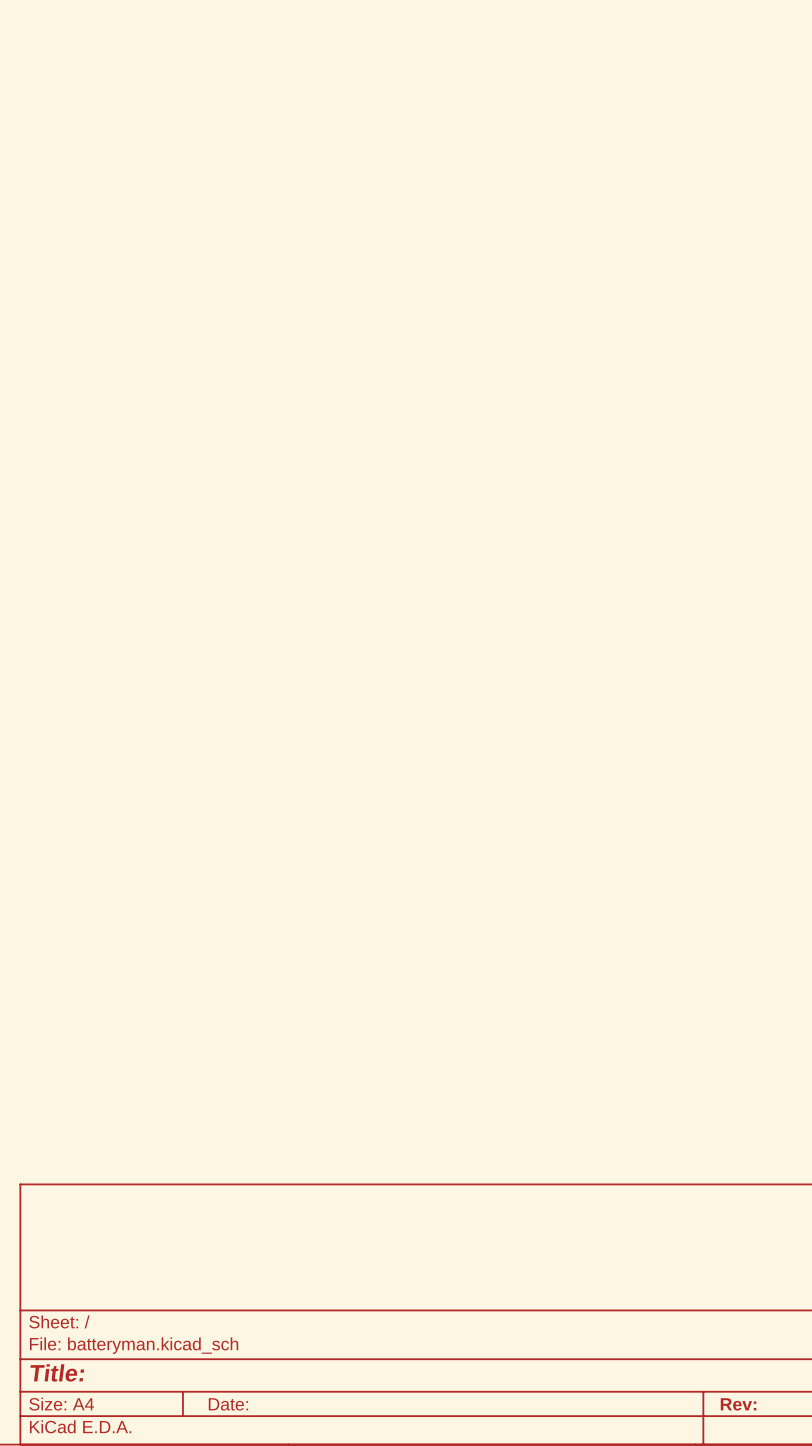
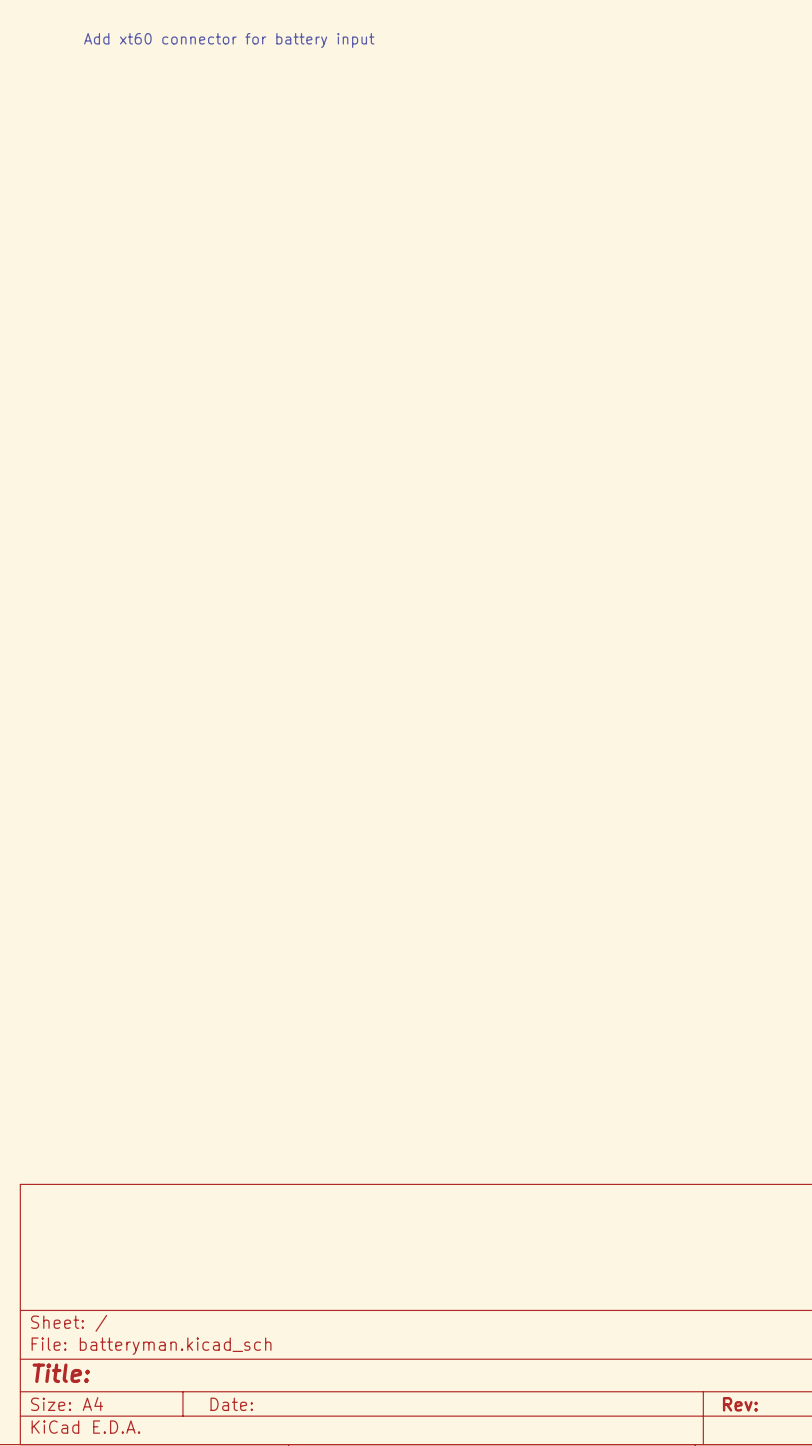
text: none -> Add xt60 connector for battery input (229, 40)

